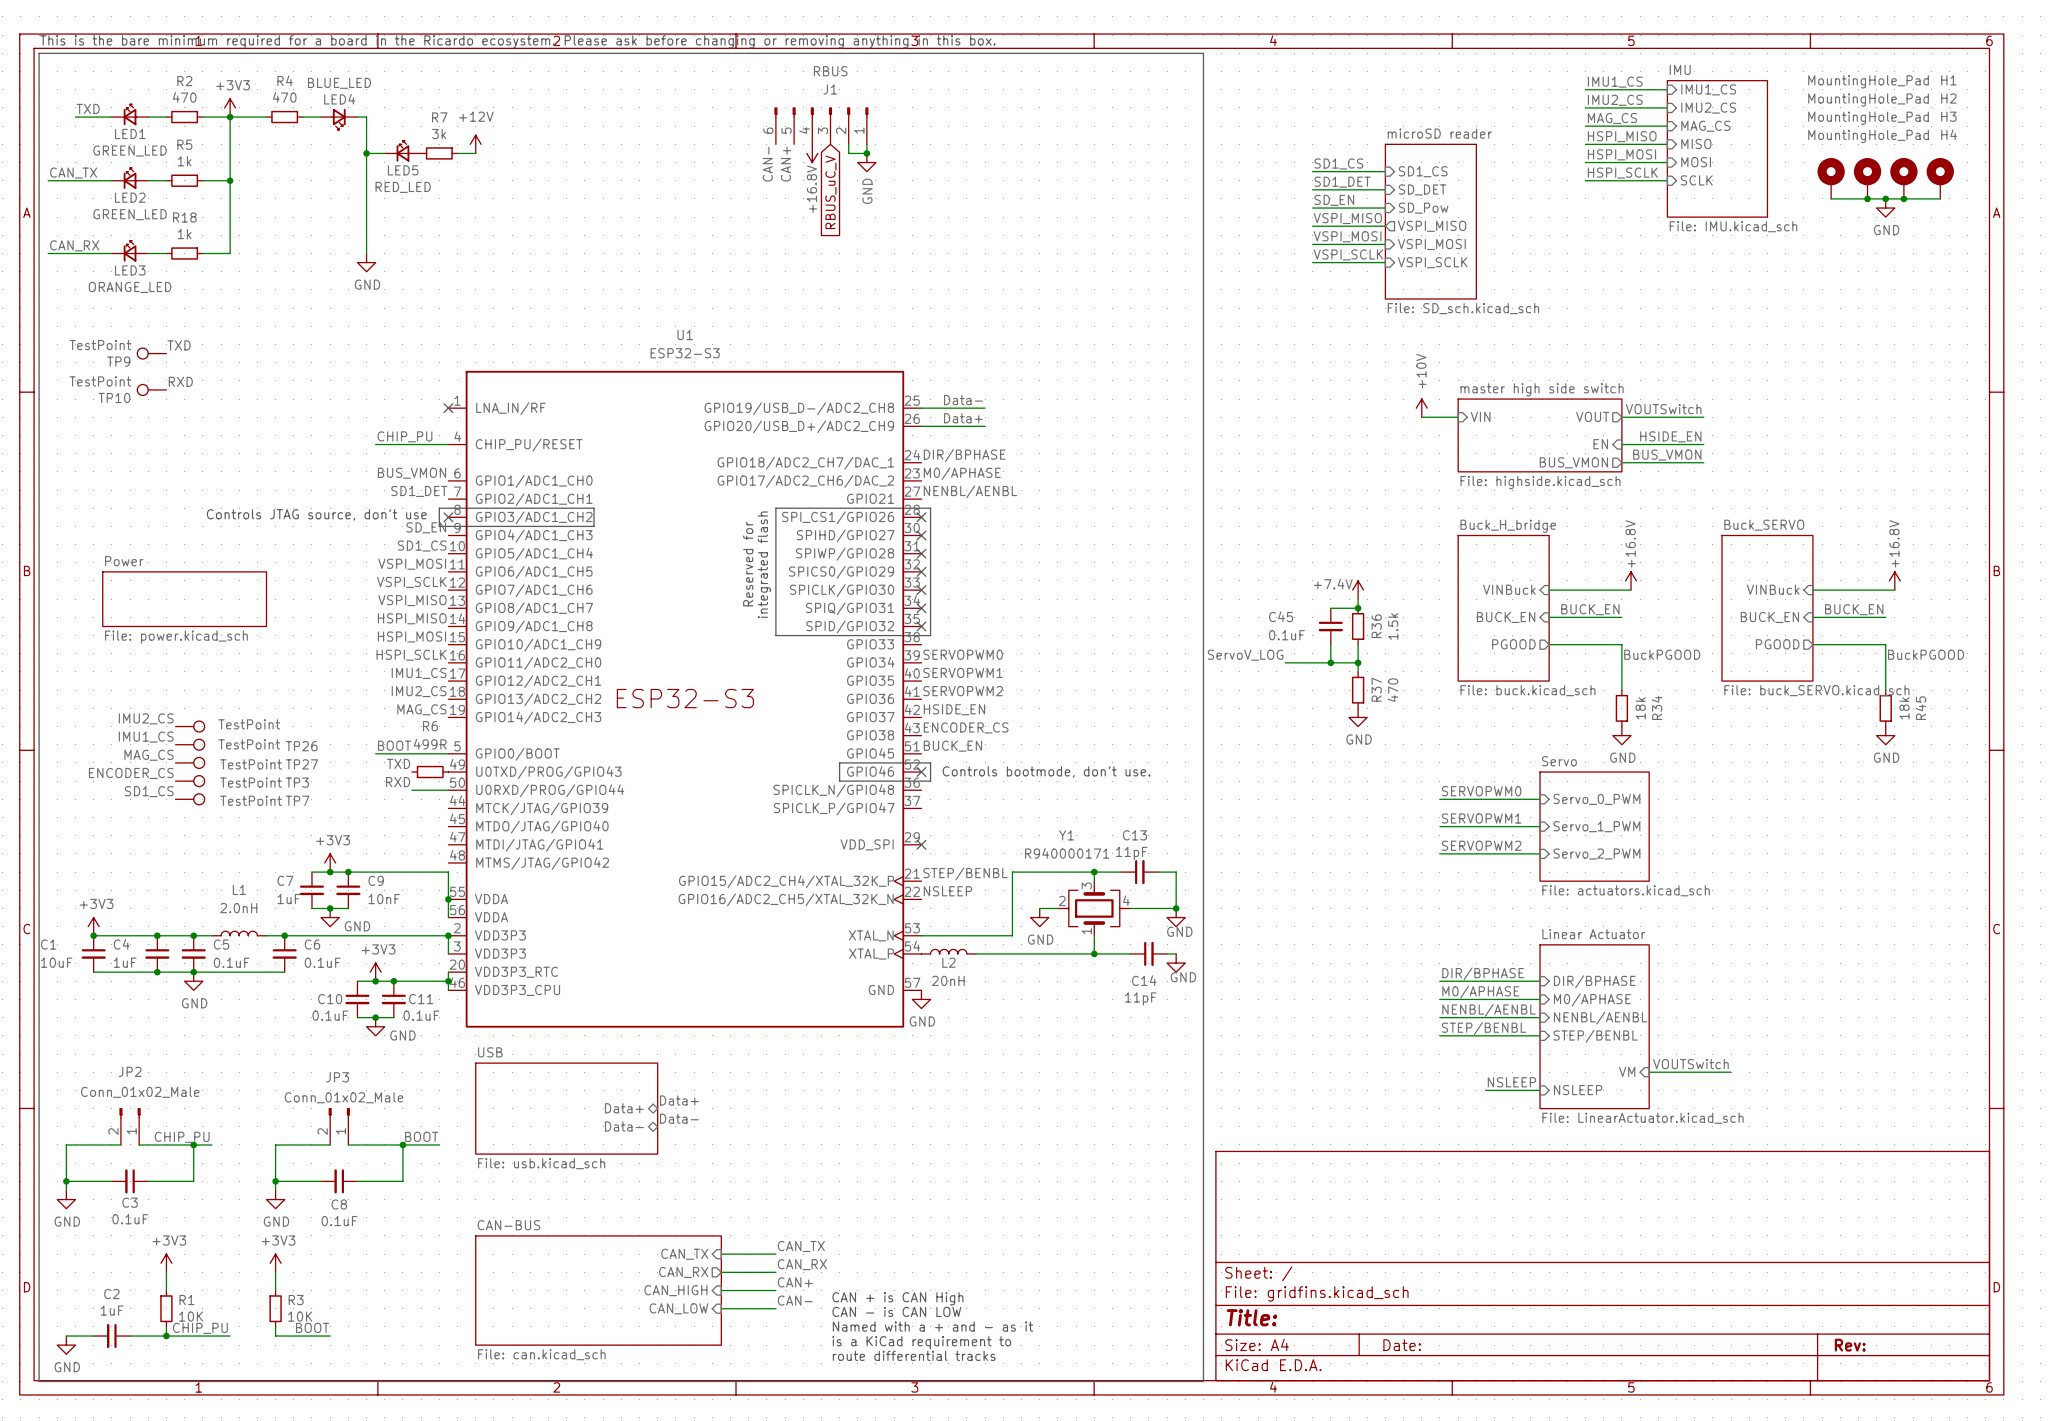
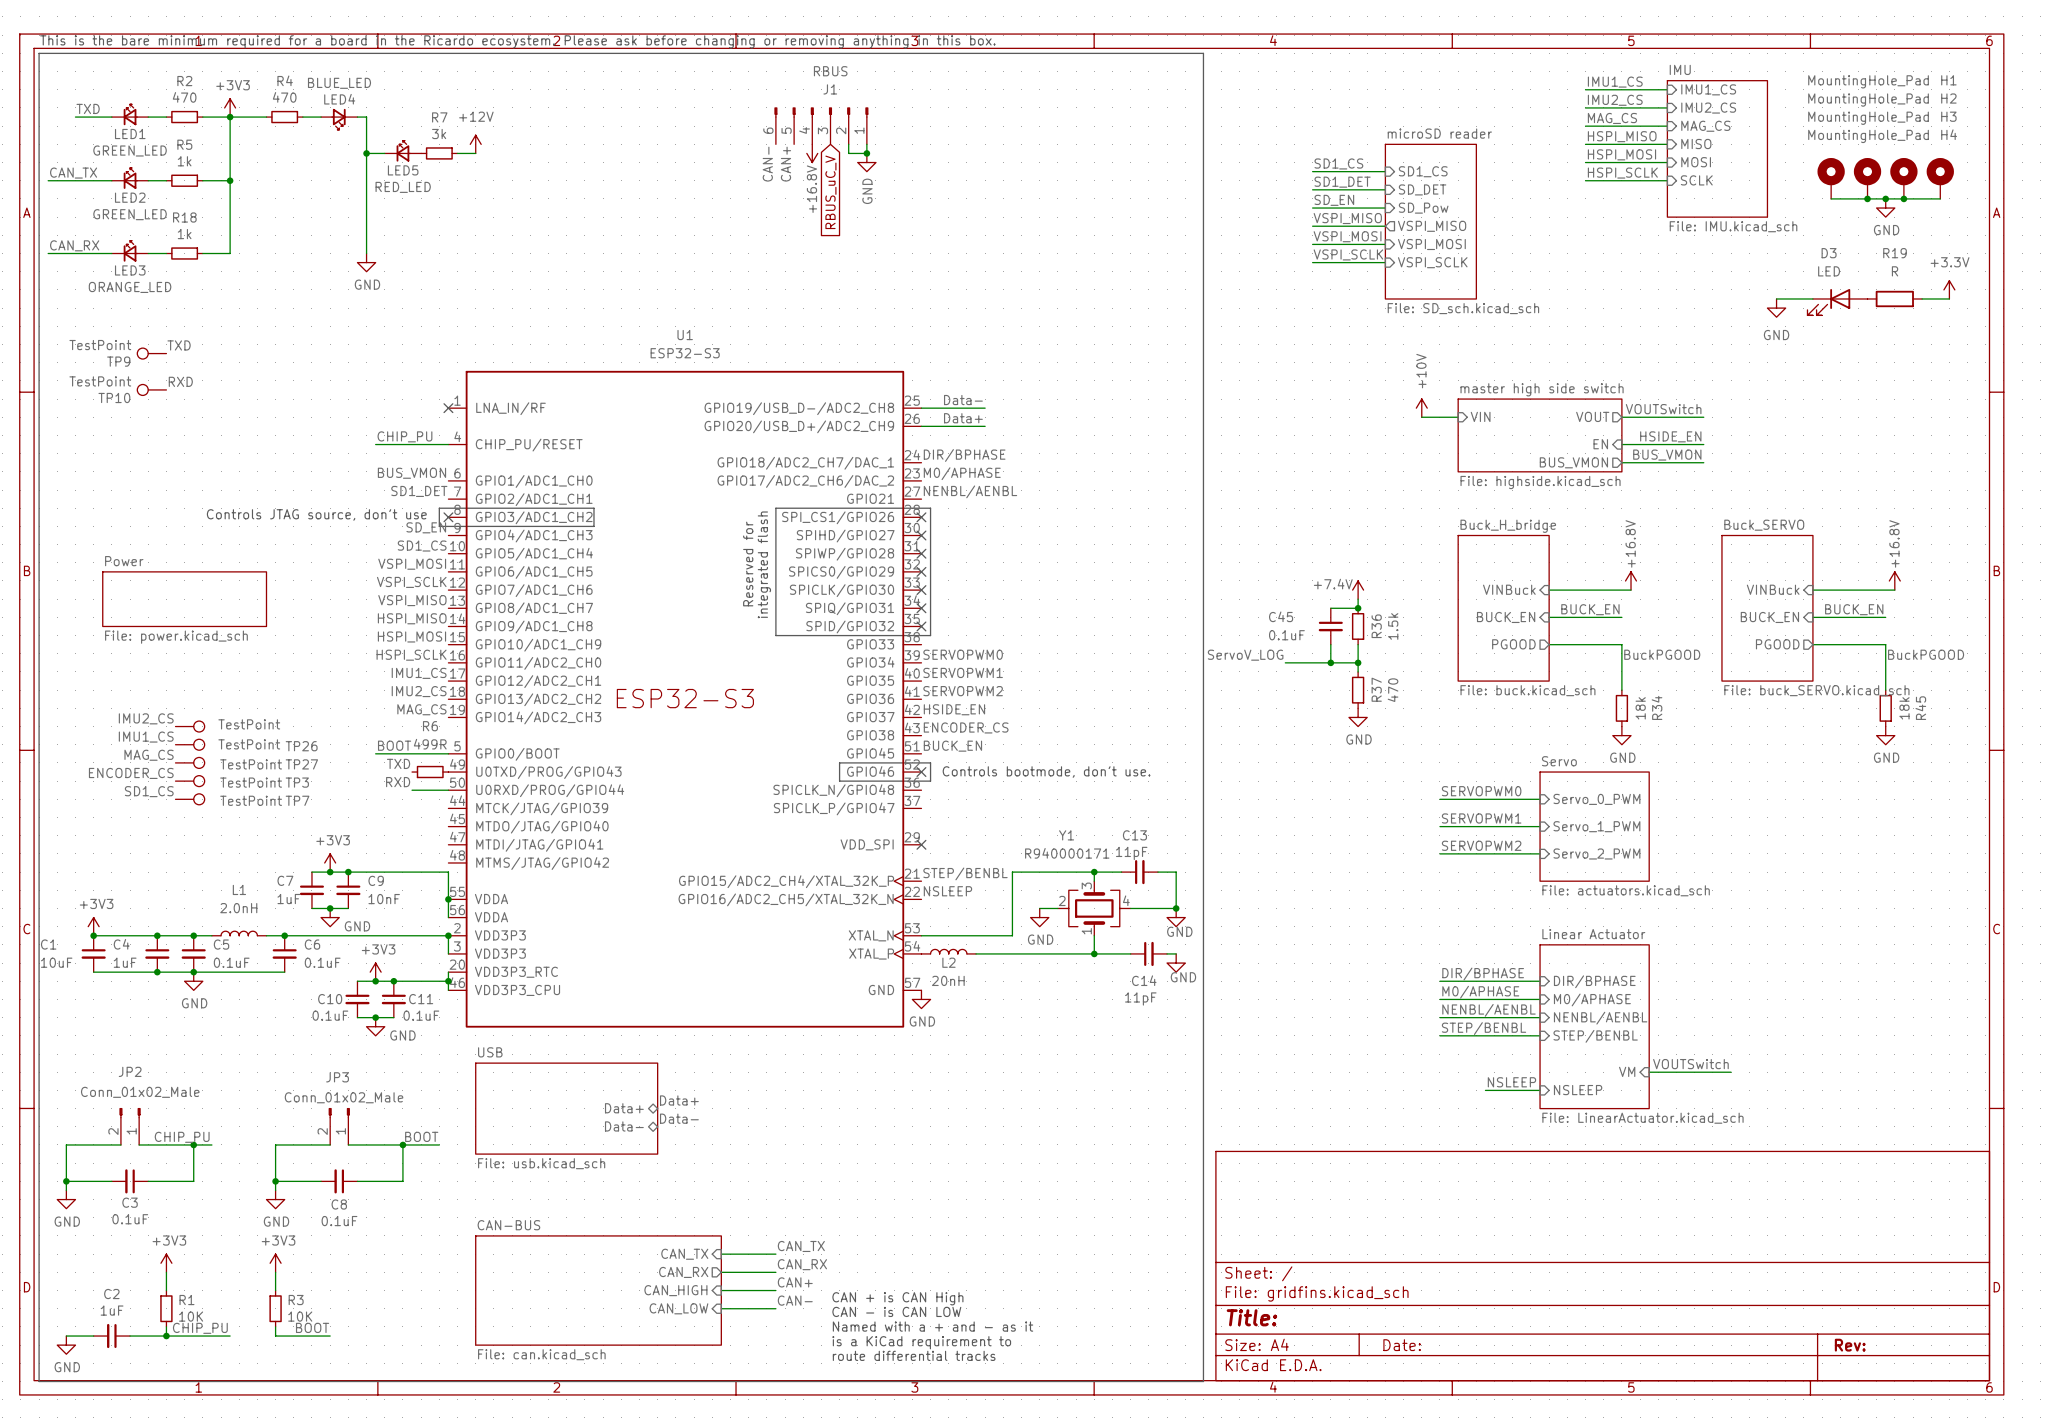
power symbol: none -> +3.3V (1949, 289)
wire: none -> (1776, 298) (1812, 298)
R19: none -> R (1894, 298)
wire: none -> (1922, 298) (1949, 298)
D3: none -> LED (1837, 302)
power symbol: none -> GND (1776, 308)

